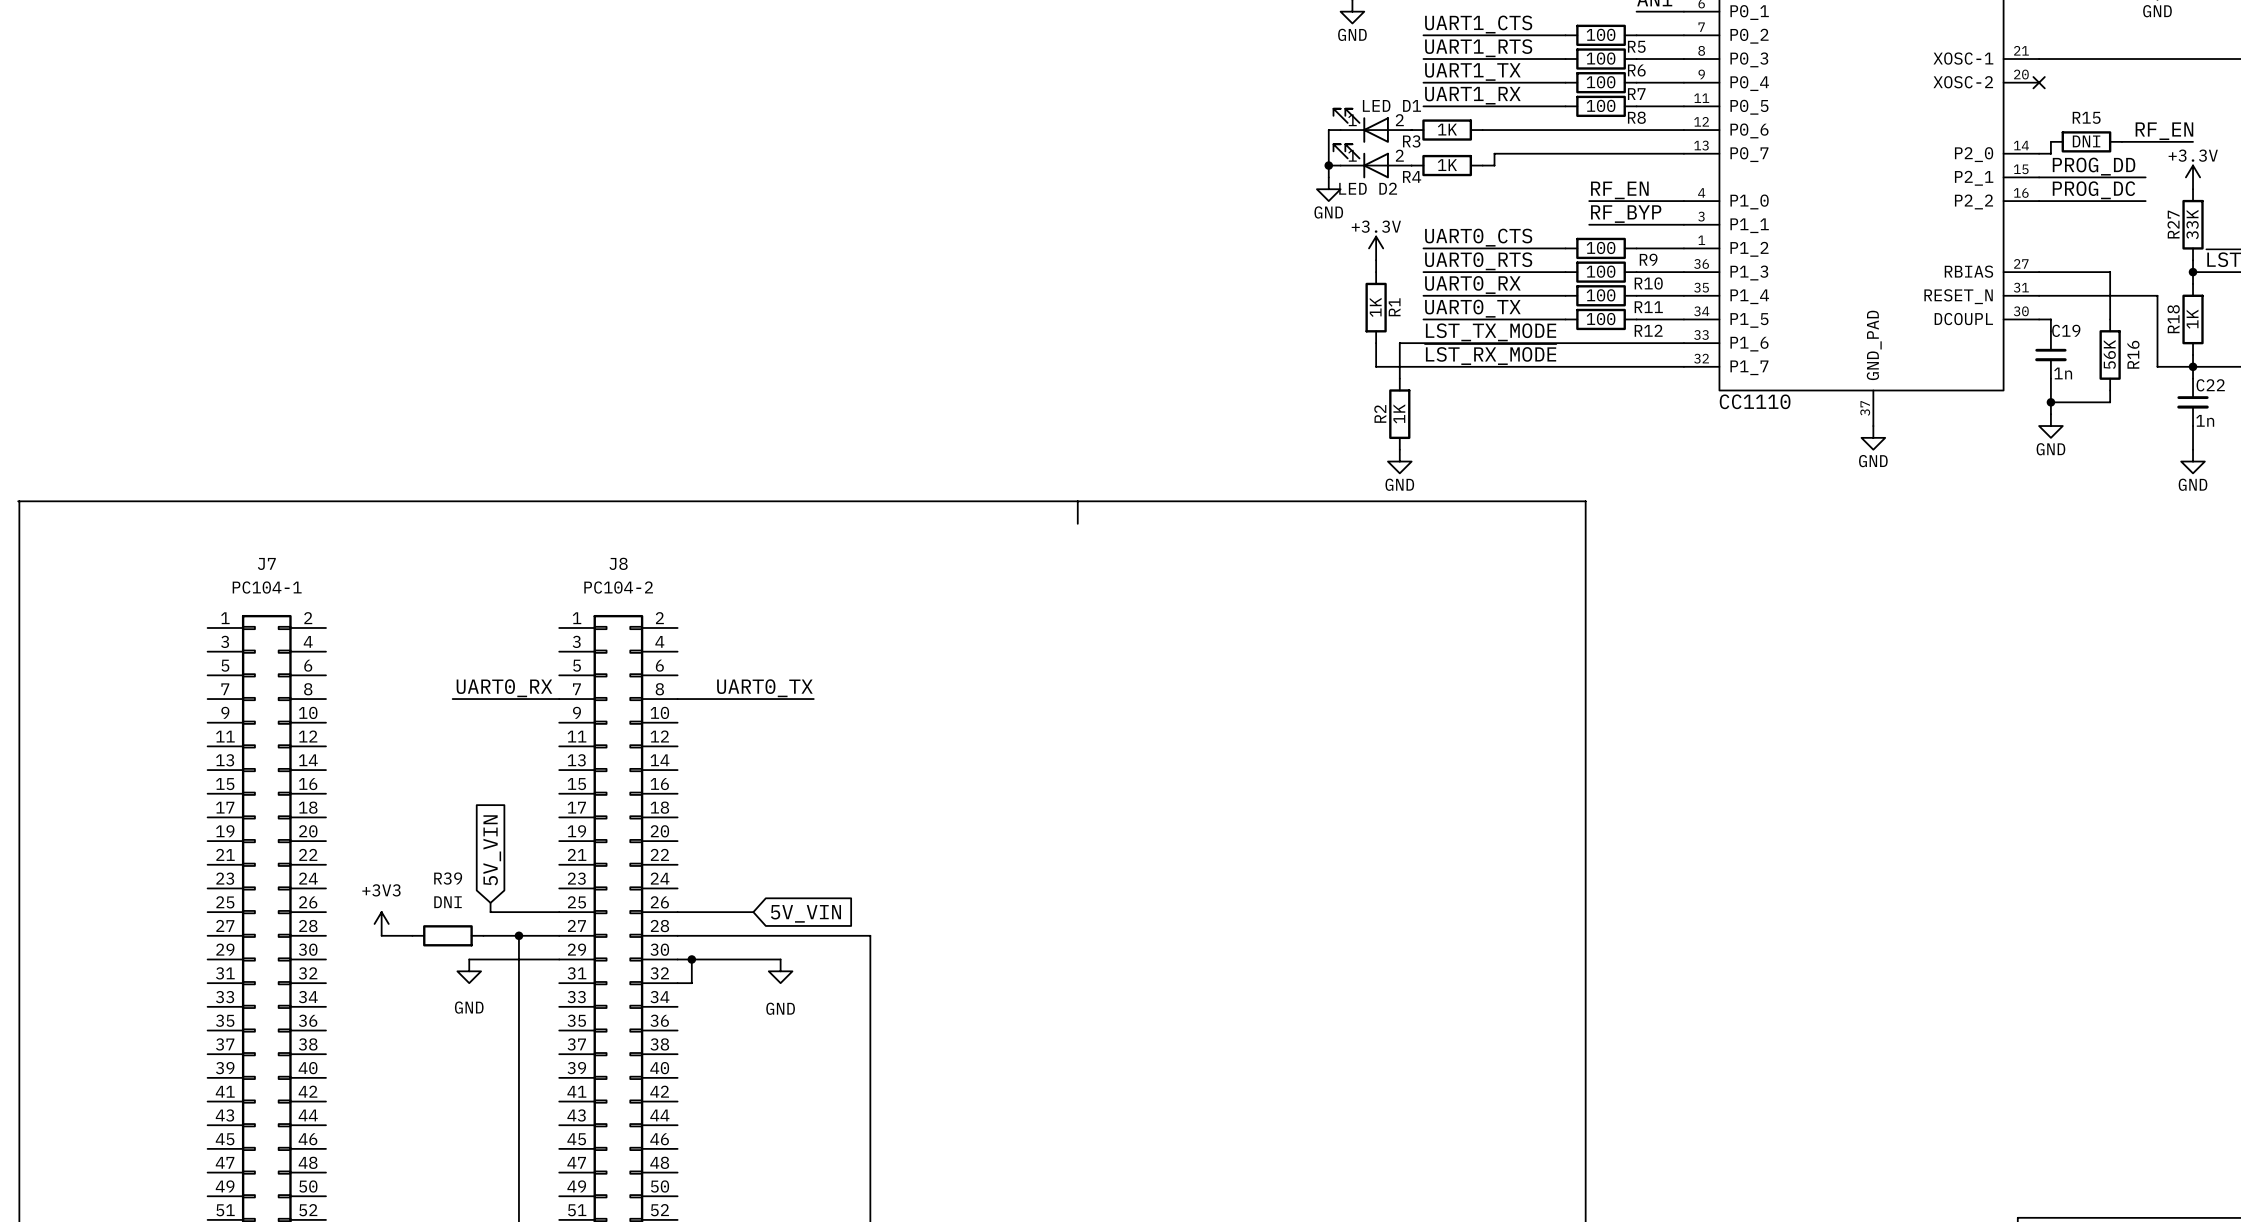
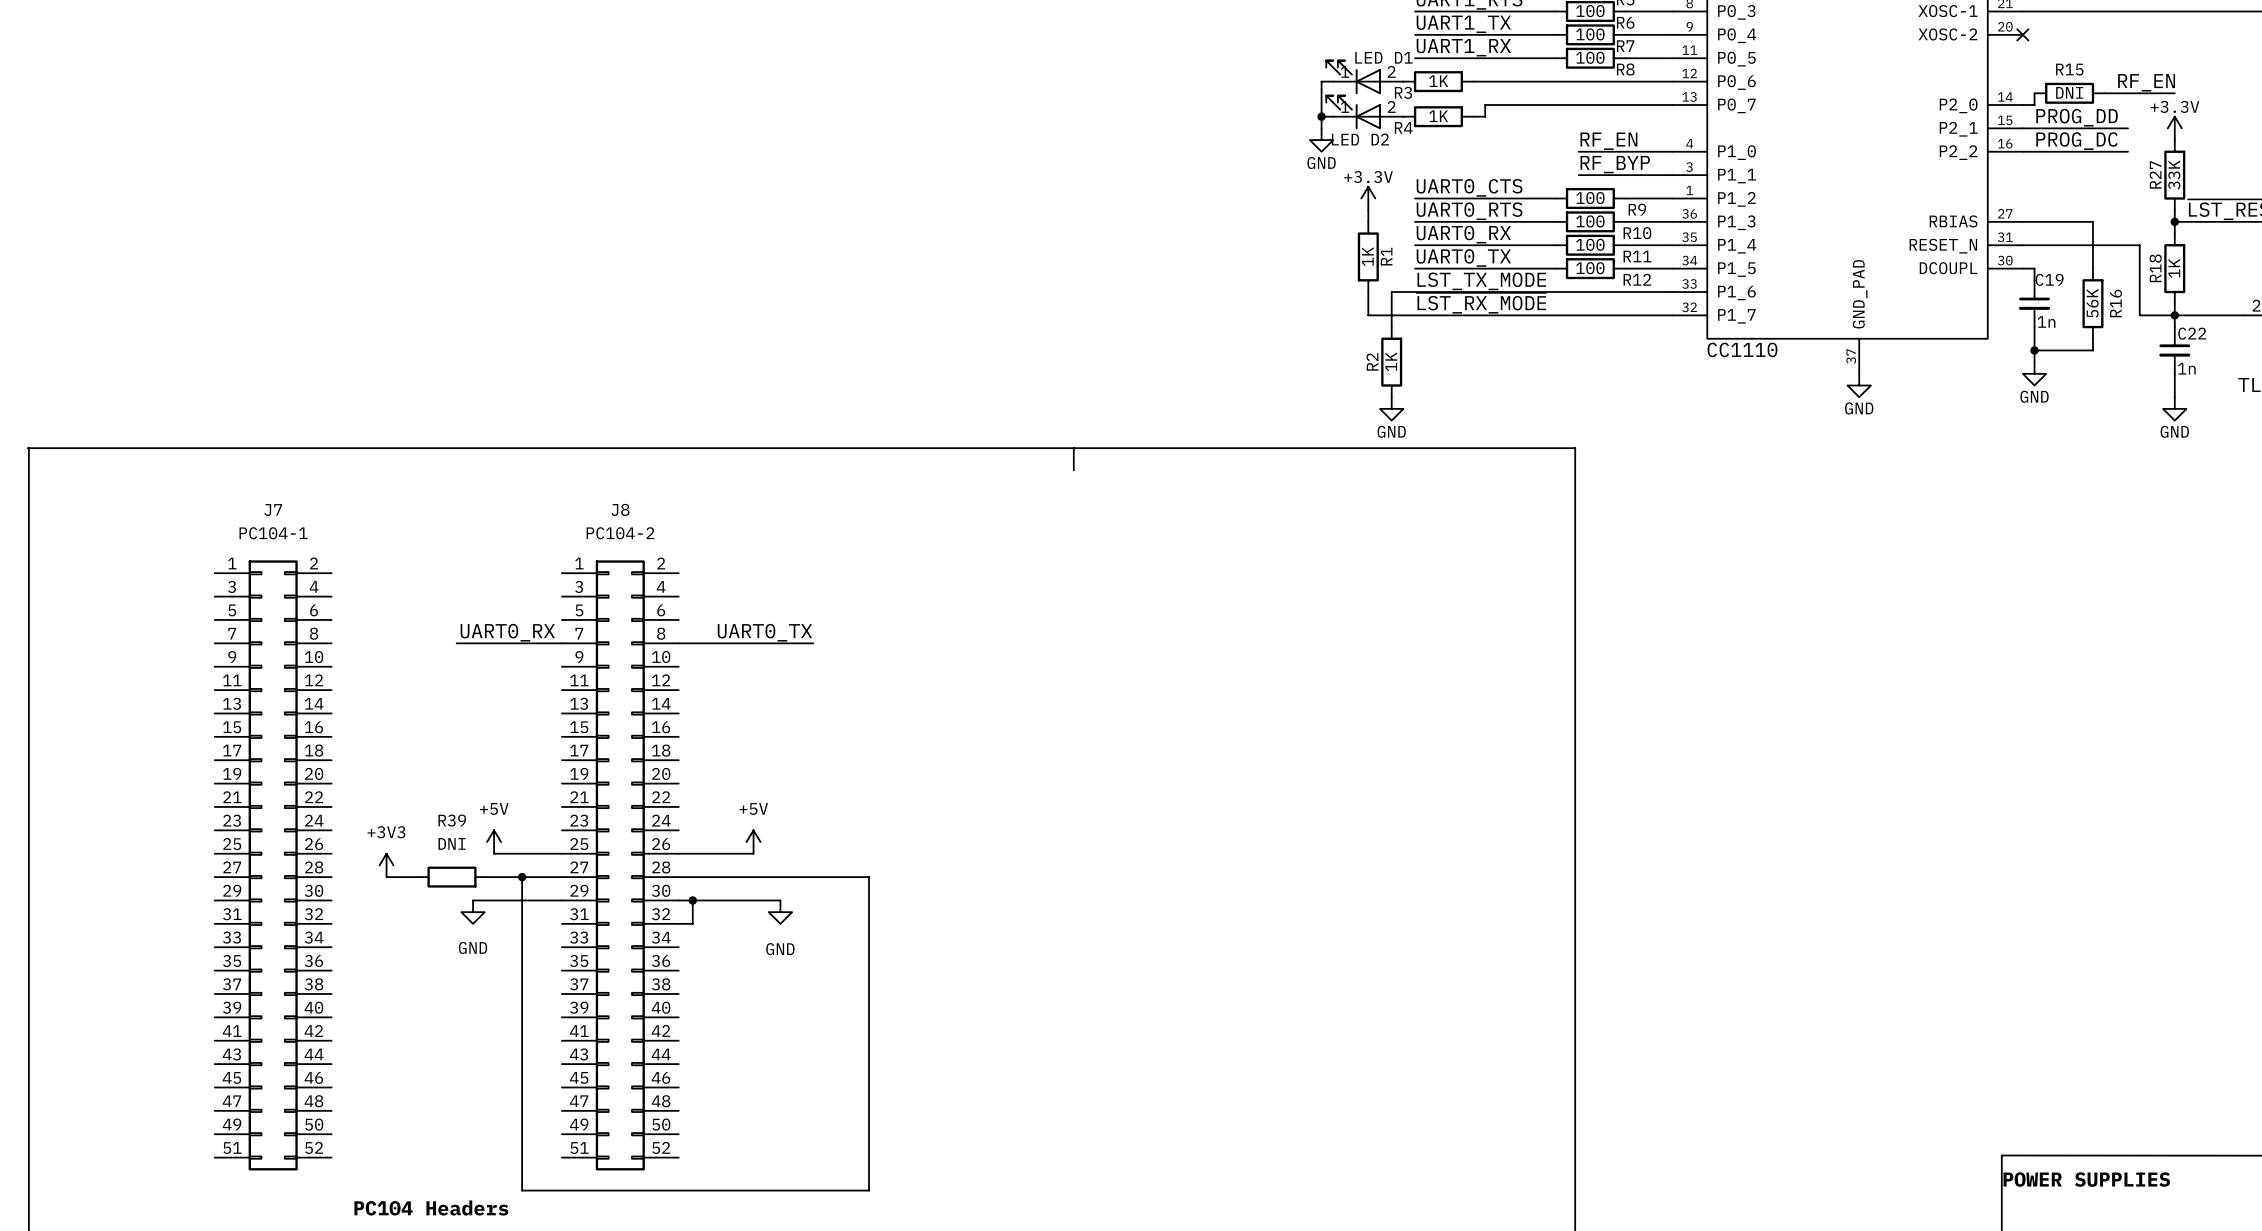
global label: 5V_VIN (492, 850) -> none
power symbol: none -> +5V (494, 842)
power symbol: none -> +5V (753, 842)
global label: 5V_VIN (805, 913) -> none

